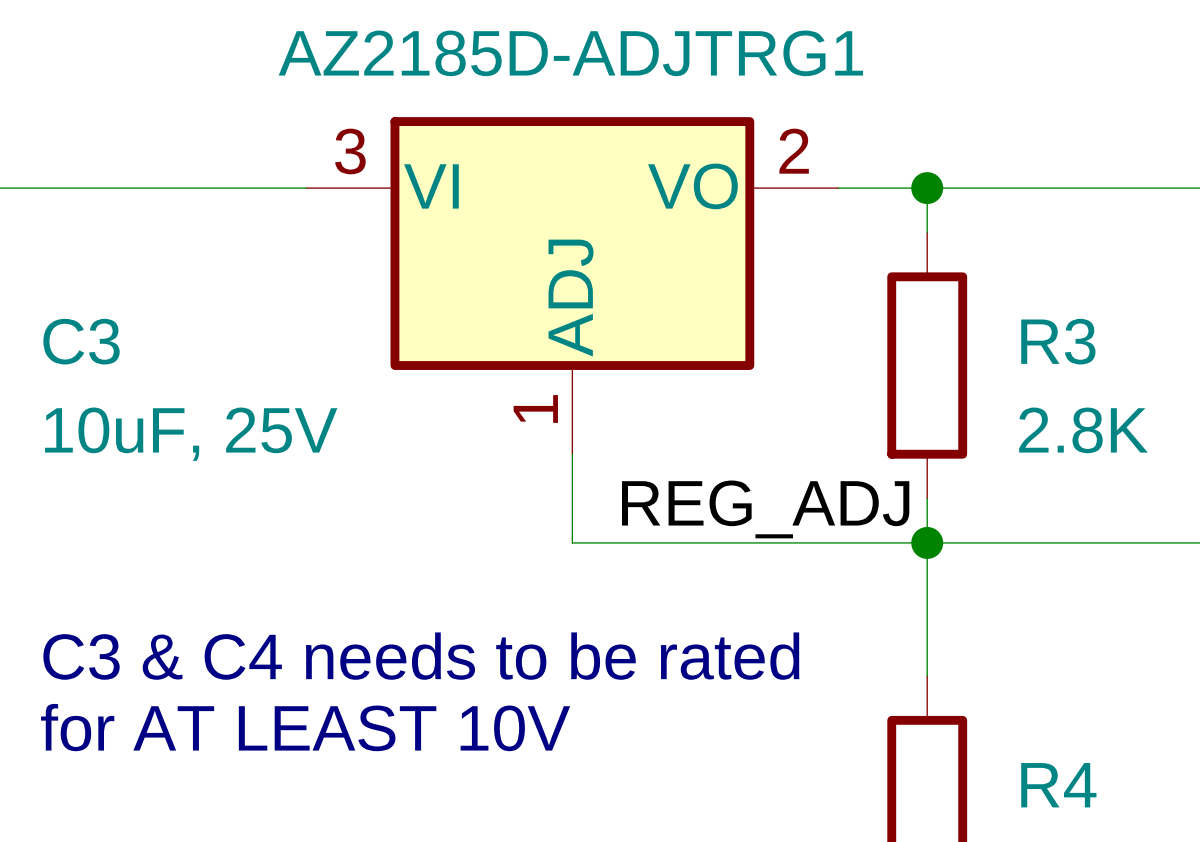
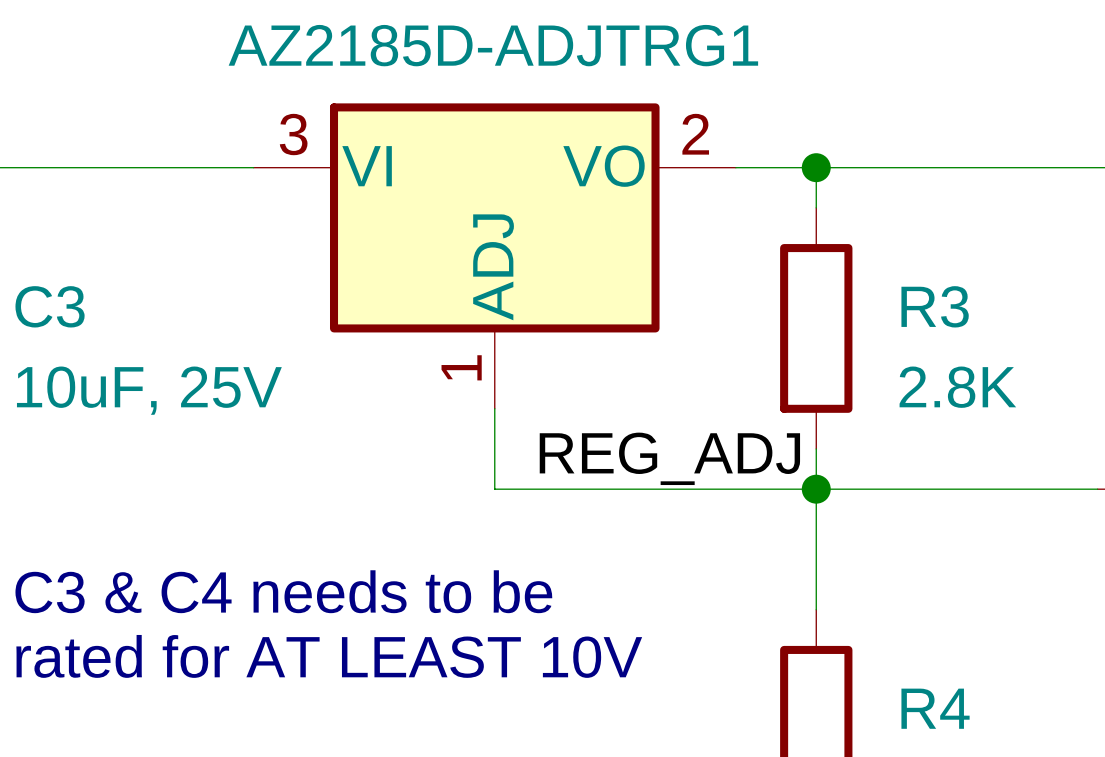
text: C3 & C4 needs to be rated (421, 656) -> C3 & C4 needs to be (283, 591)
text: for AT LEAST 10V (305, 727) -> rated for AT LEAST 10V (329, 656)

